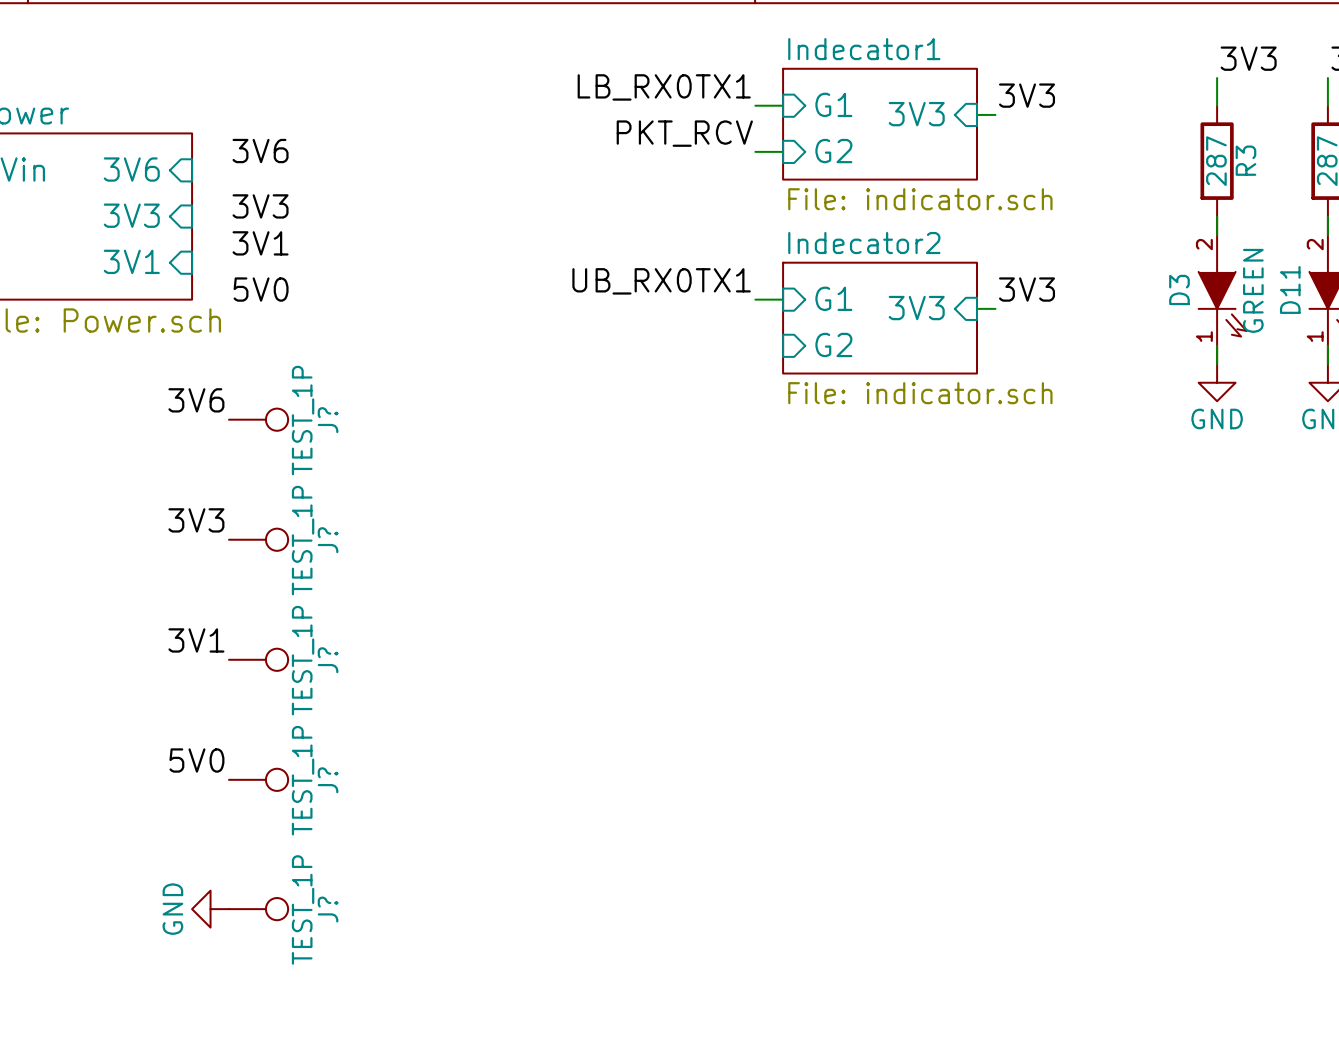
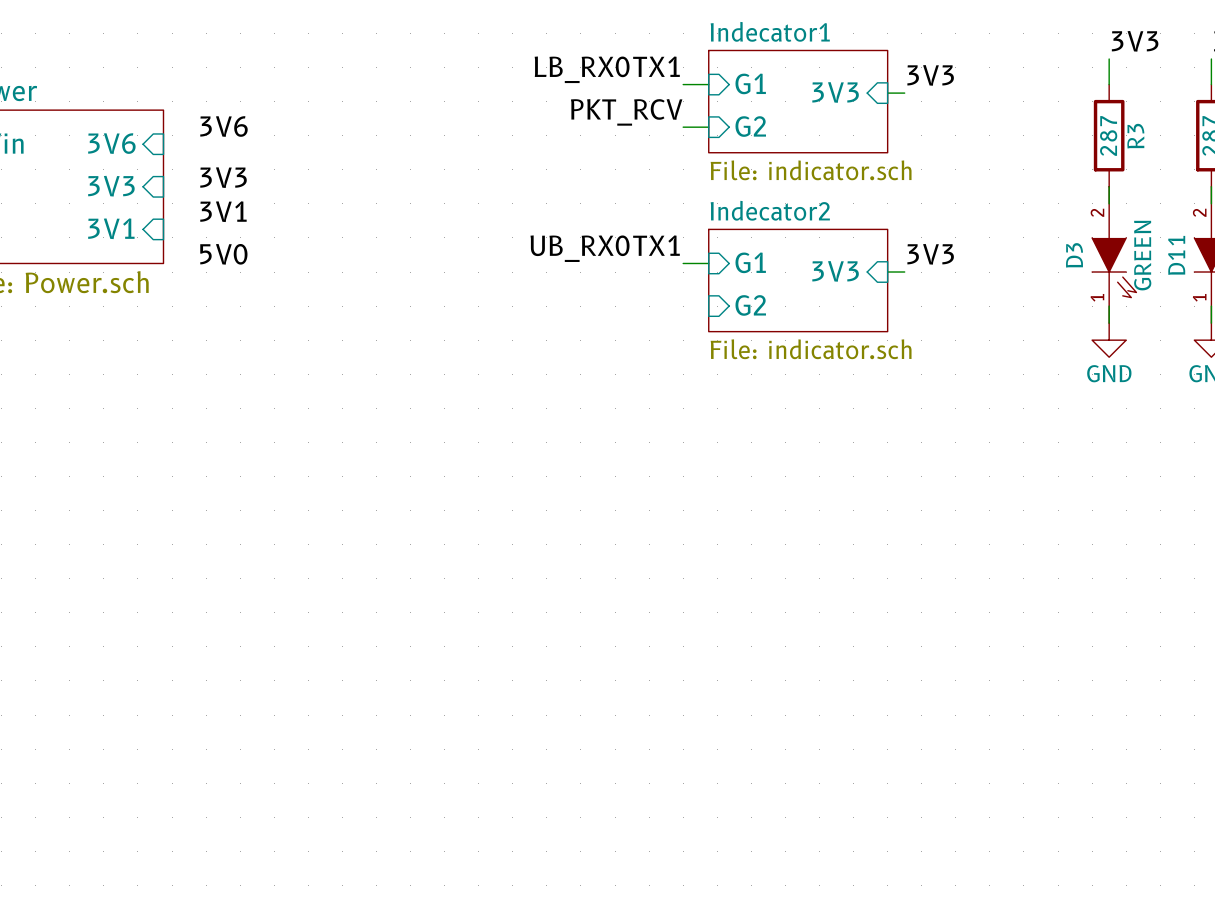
label: 3V6 (196, 400) -> none
J?: TEST_1P (258, 419) -> none
label: 3V3 (196, 520) -> none
J?: TEST_1P (258, 539) -> none
label: 3V1 (196, 640) -> none
J?: TEST_1P (258, 659) -> none
label: 5V0 (196, 760) -> none
J?: TEST_1P (258, 779) -> none
power symbol: GND (210, 909) -> none
J?: TEST_1P (258, 909) -> none

